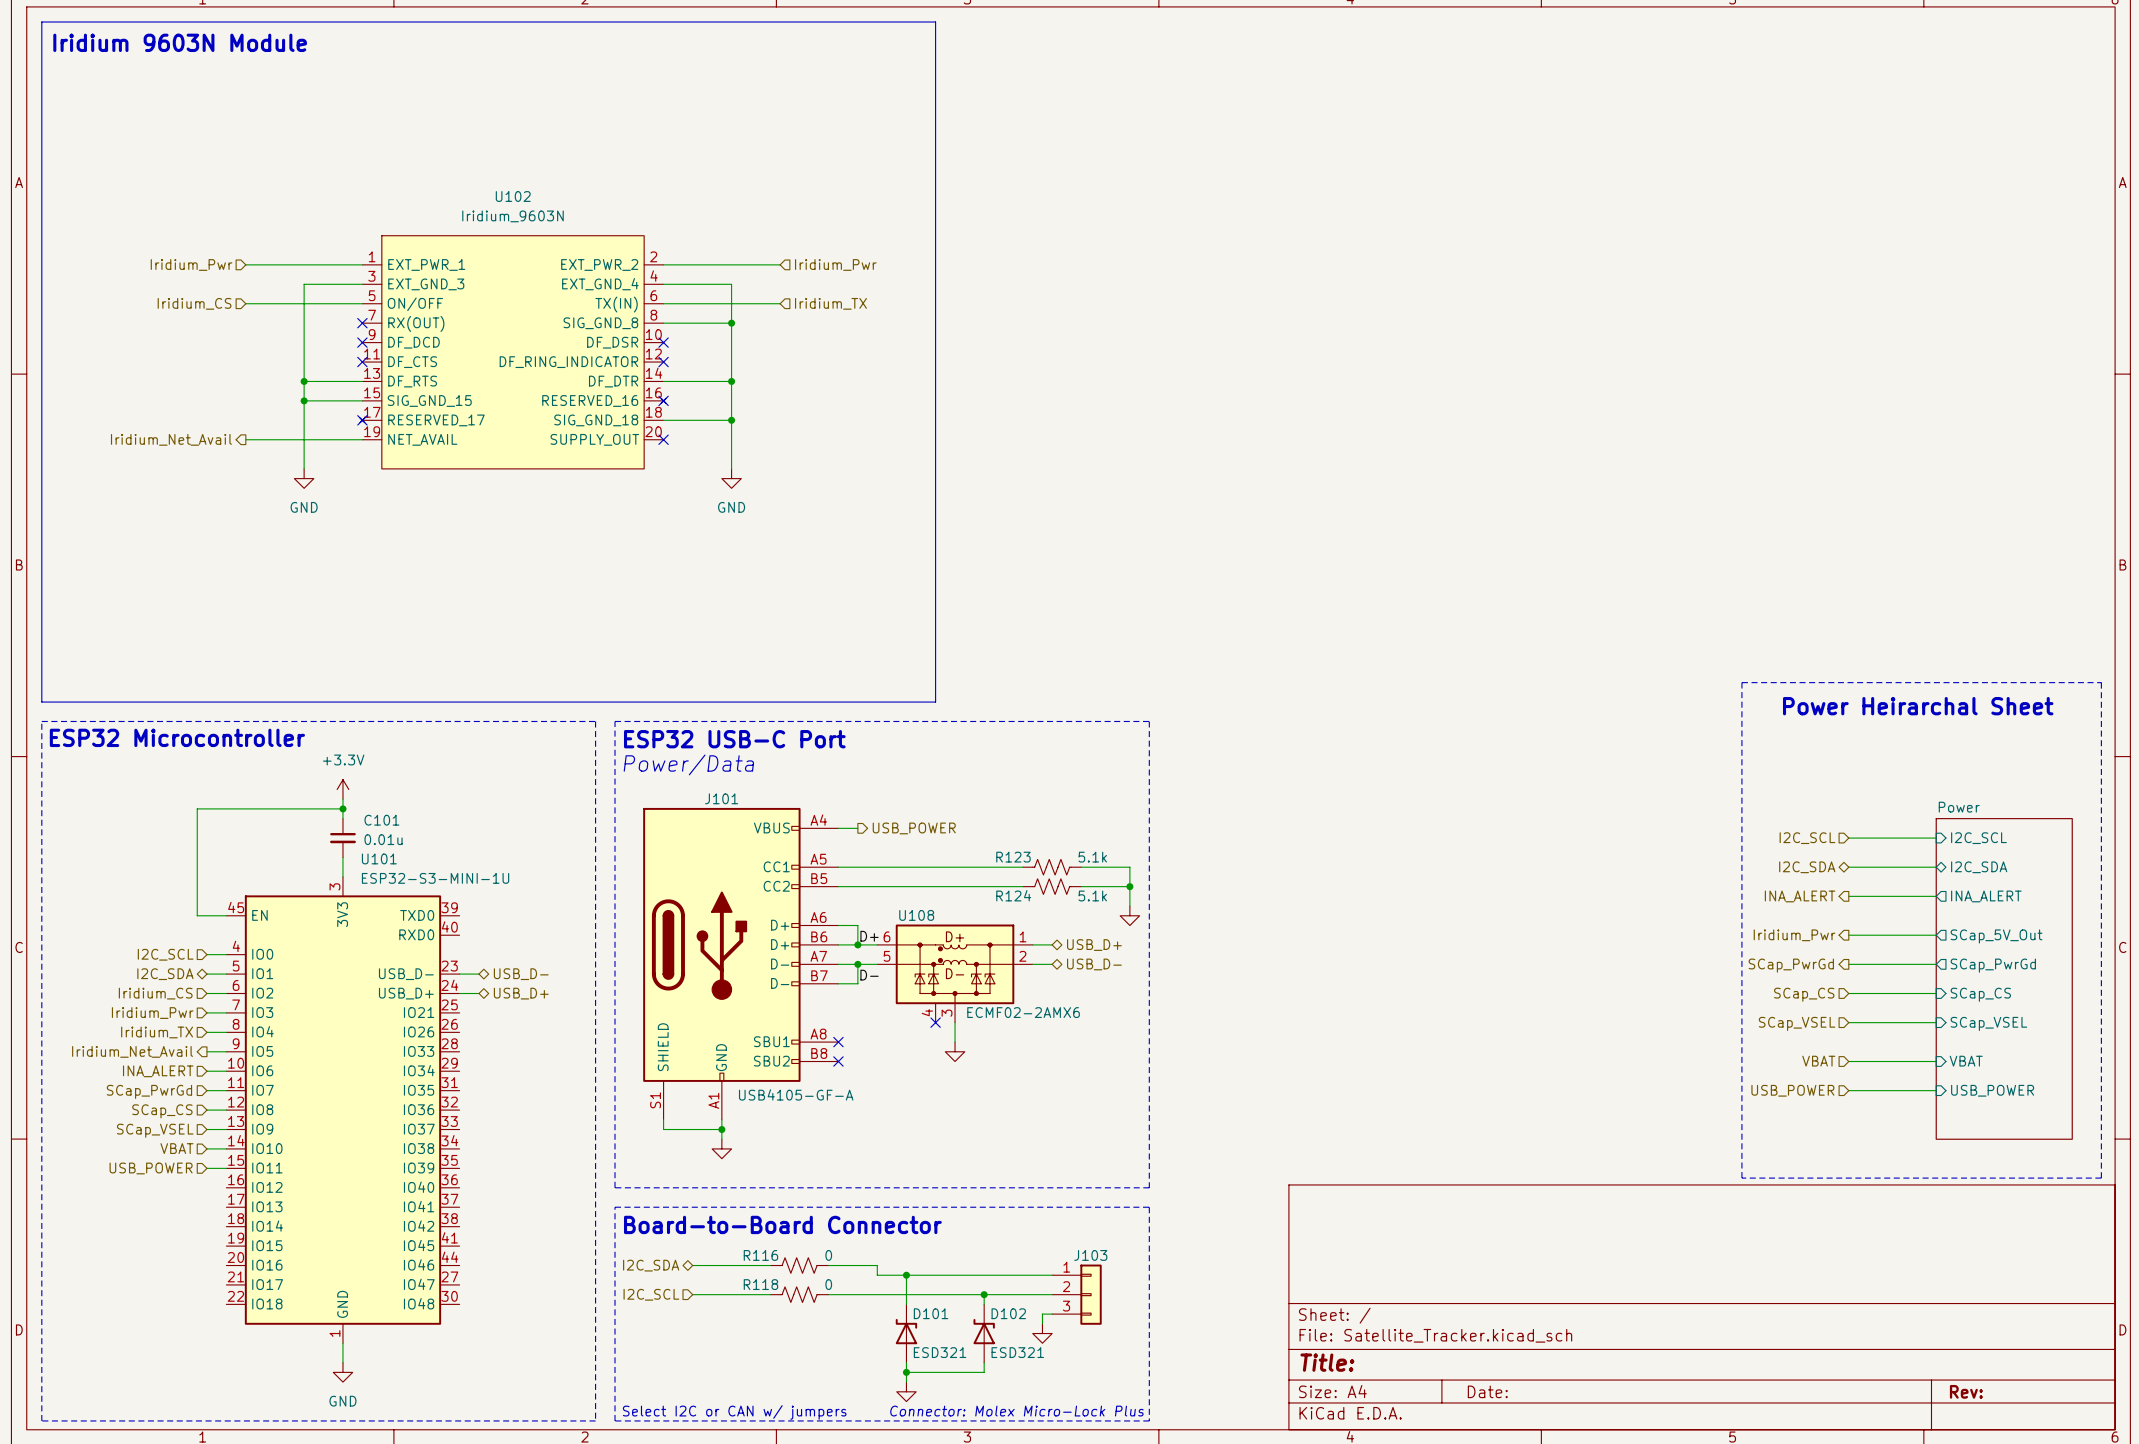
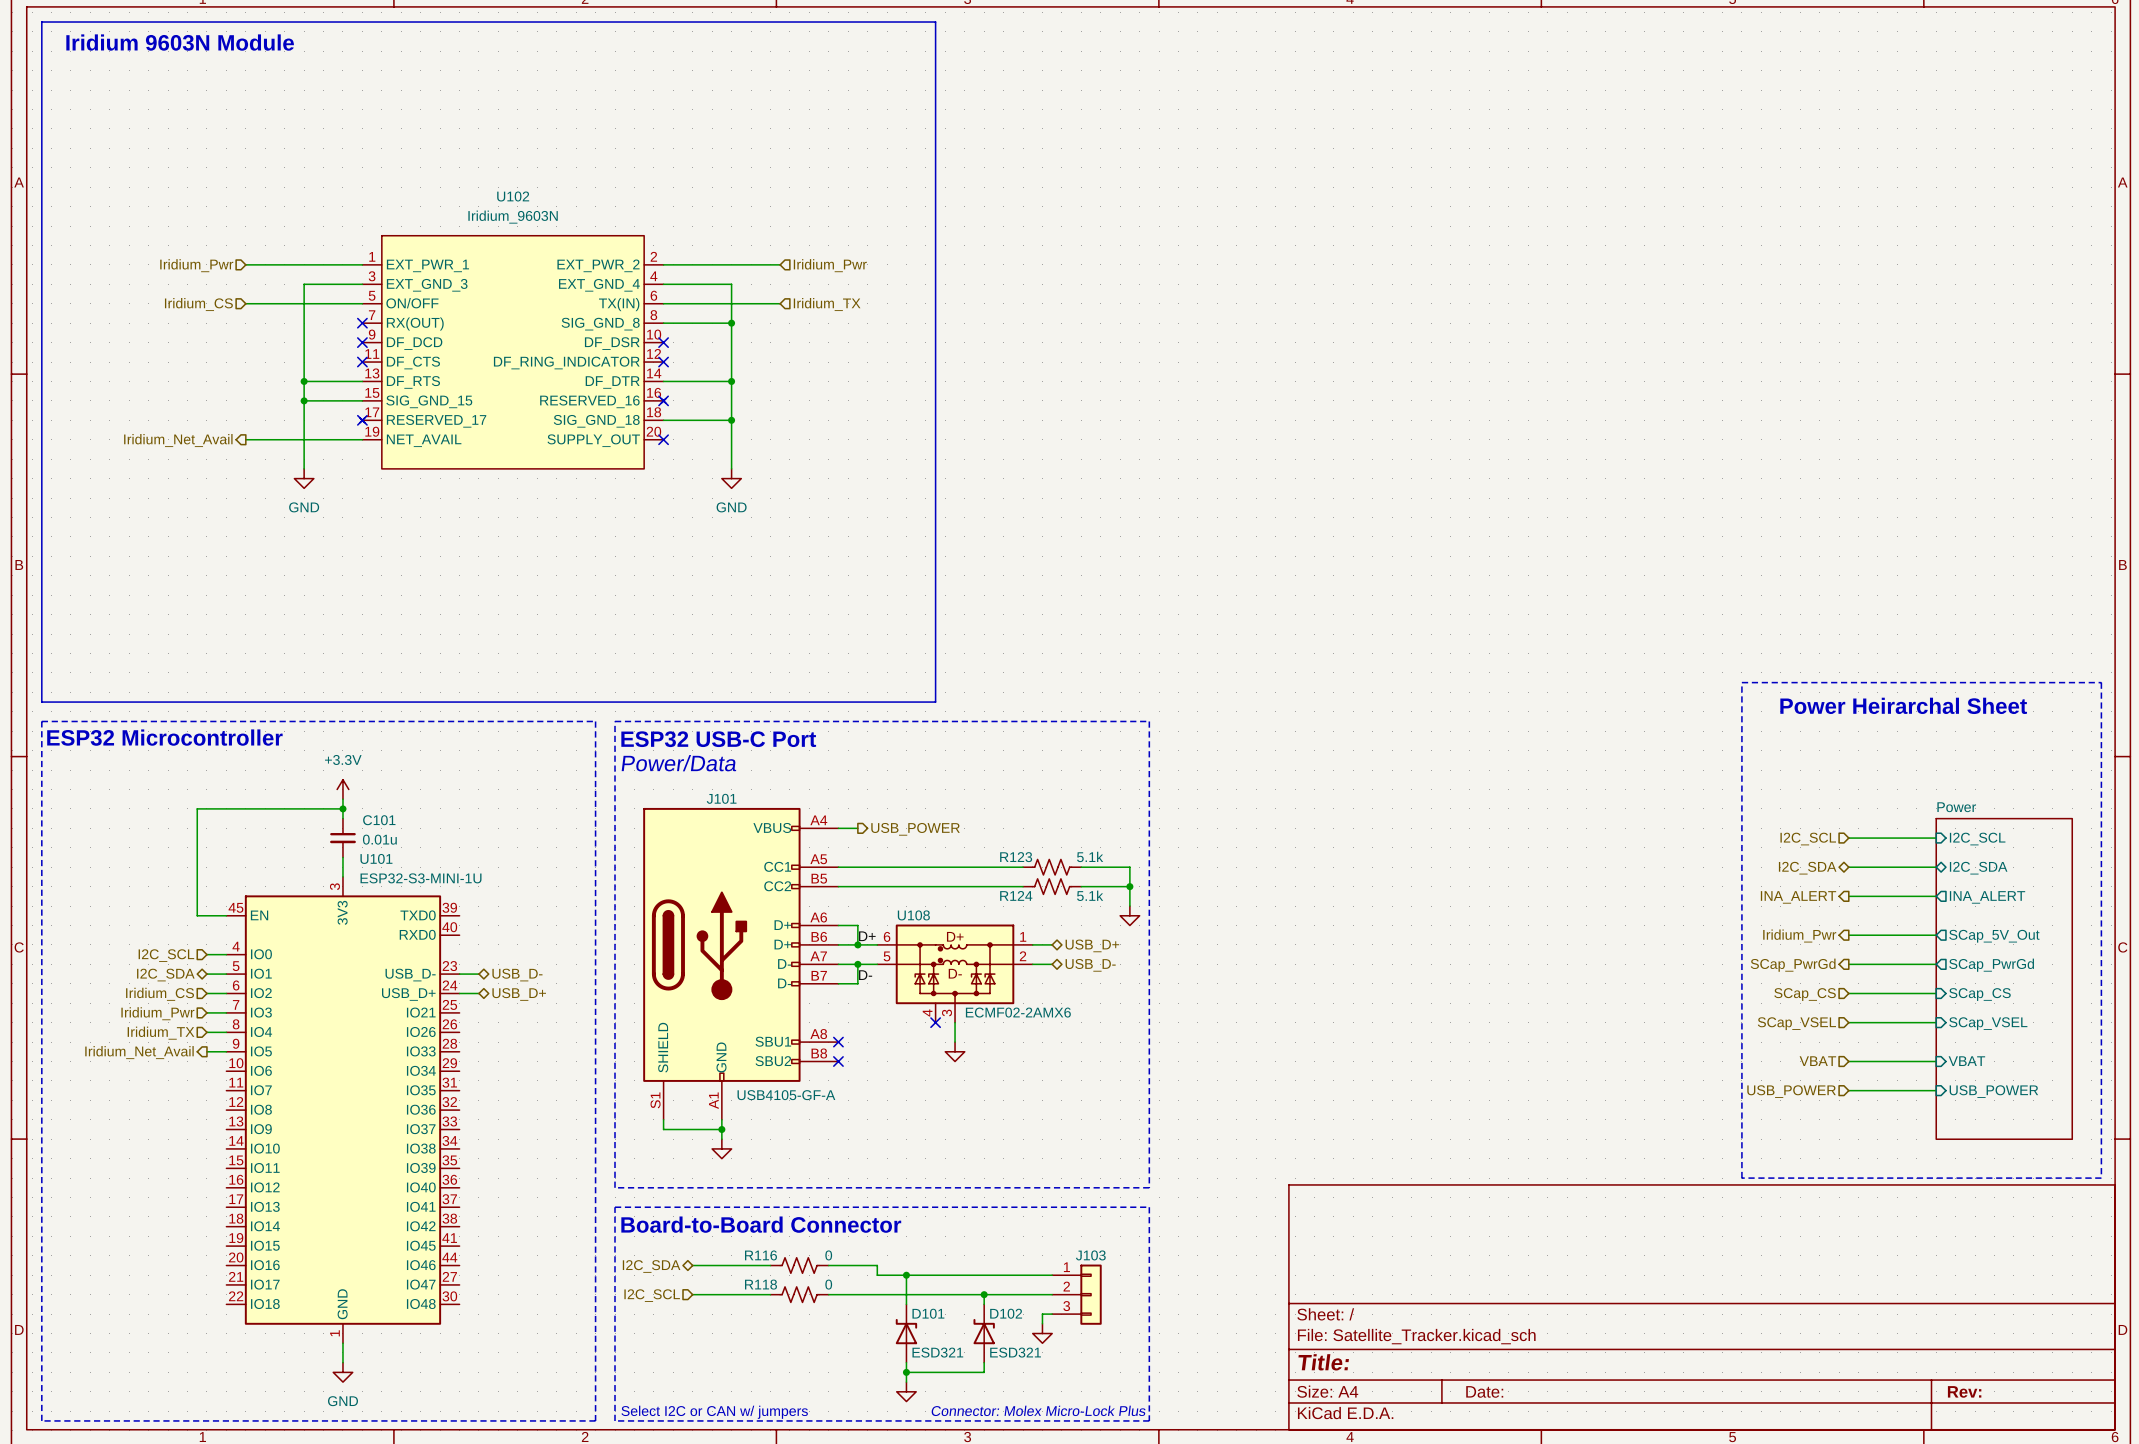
hierarchical label: INA_ALERT (158, 1071) -> none
wire: (206, 1071) (226, 1071) -> none
wire: (206, 1090) (226, 1090) -> none
hierarchical label: SCap_PwrGd (149, 1091) -> none
wire: (206, 1110) (226, 1110) -> none
hierarchical label: SCap_CS (162, 1111) -> none
wire: (206, 1129) (226, 1129) -> none
hierarchical label: SCap_VSEL (155, 1130) -> none
hierarchical label: VBAT (176, 1148) -> none
wire: (206, 1148) (226, 1148) -> none
hierarchical label: USB_POWER (151, 1168) -> none
wire: (206, 1168) (226, 1168) -> none

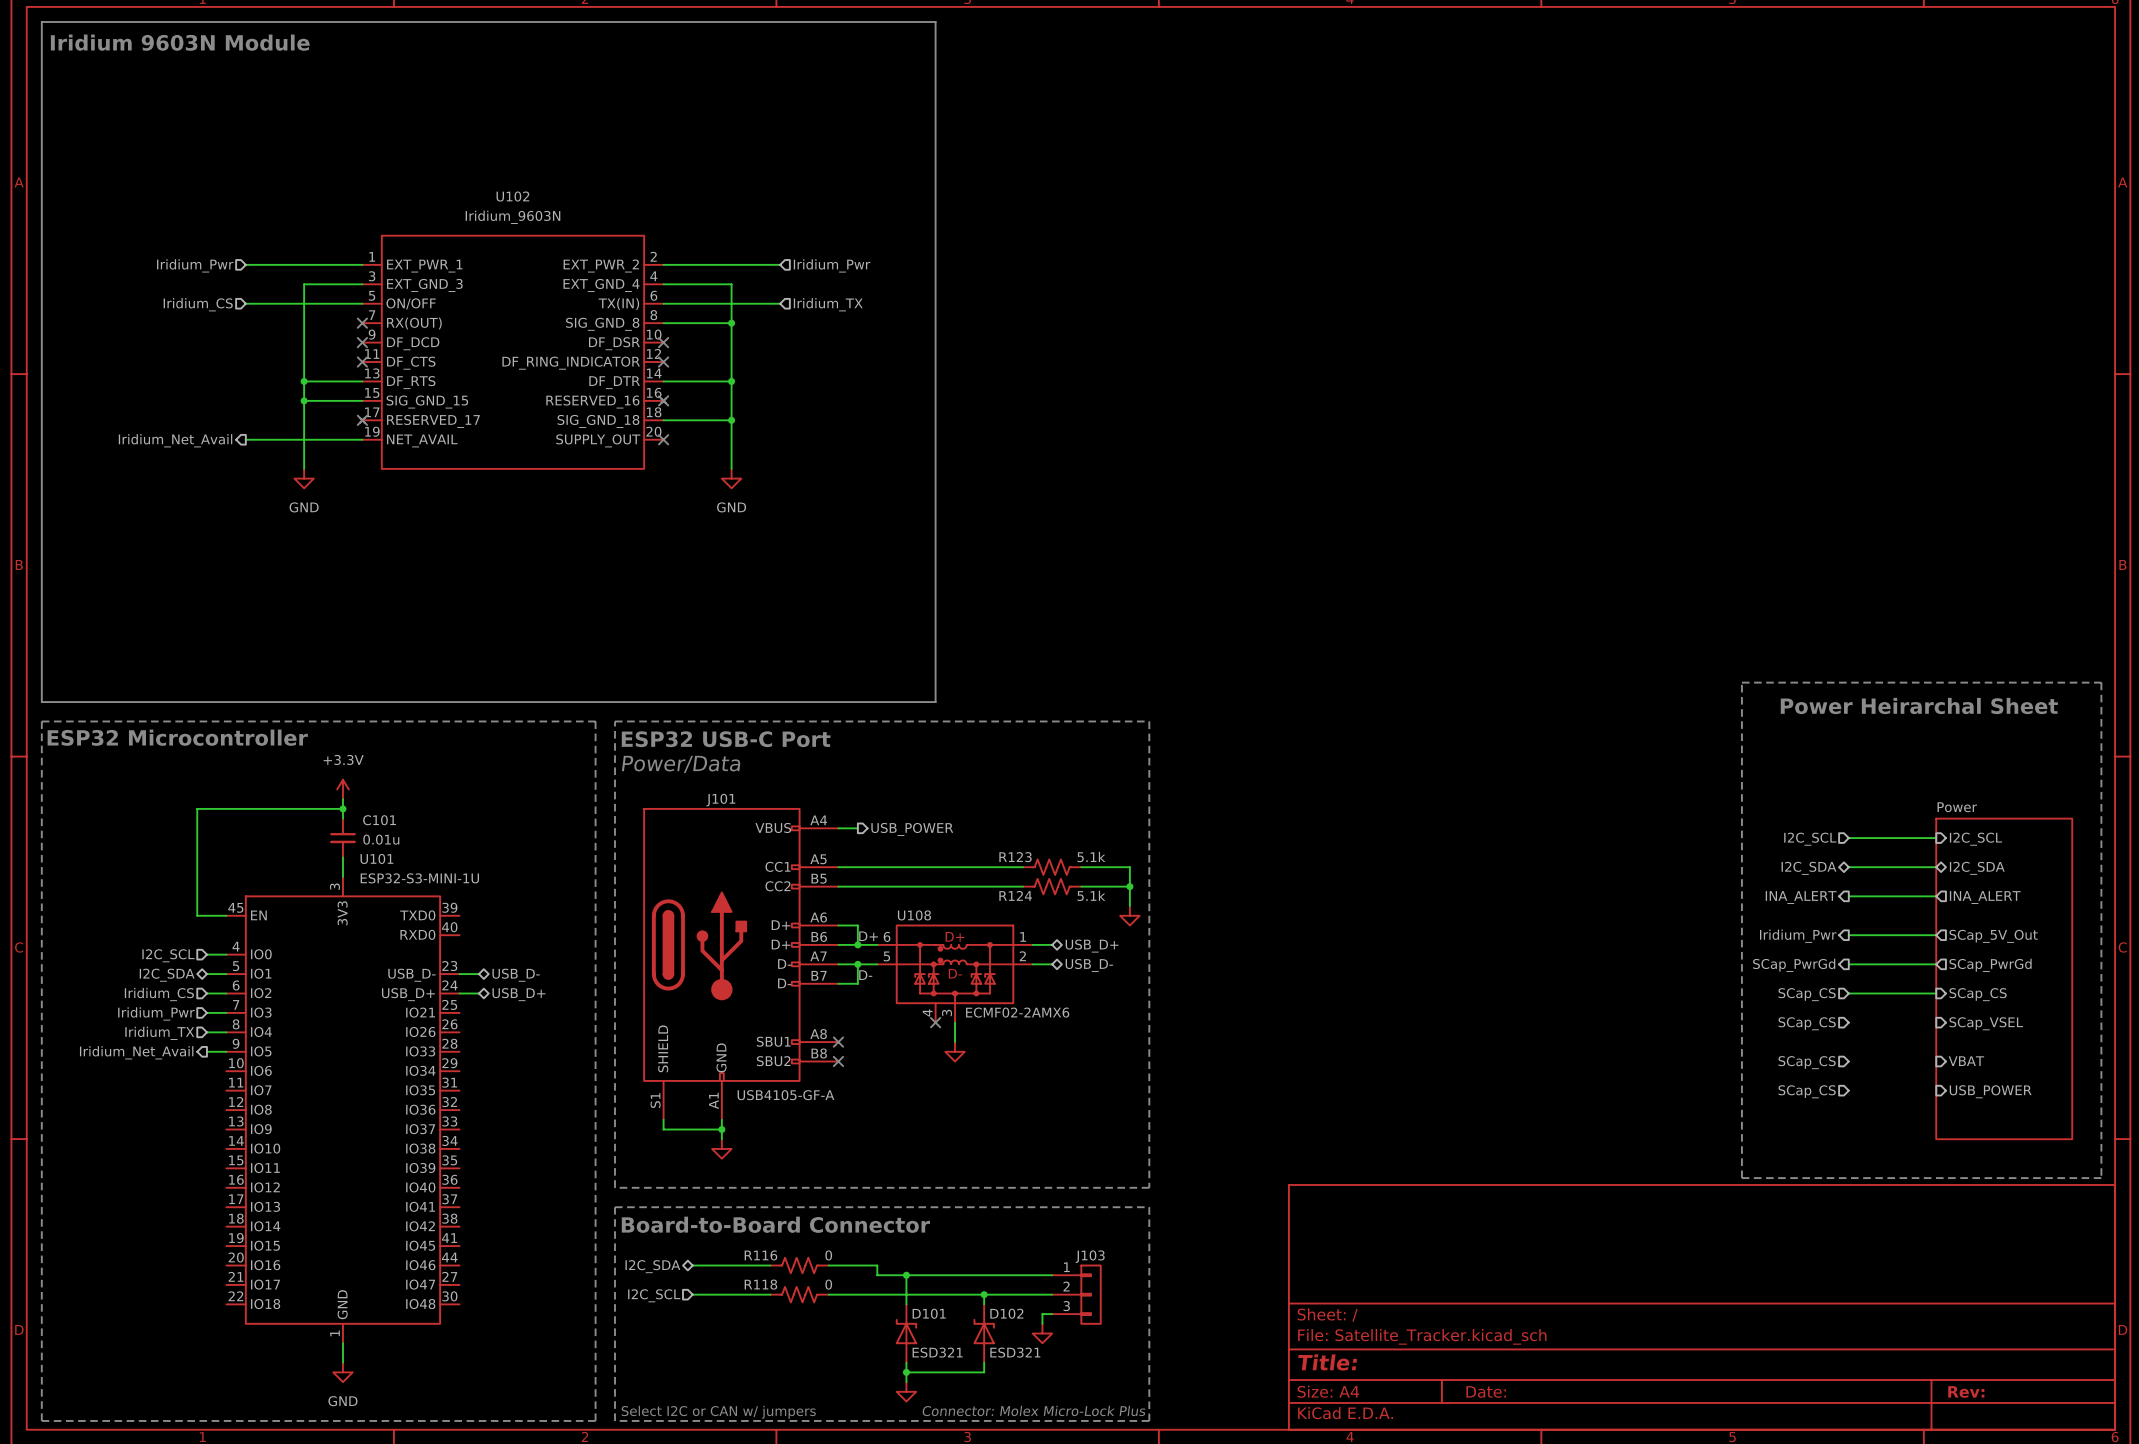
wire: (1848, 1022) (1936, 1022) -> none
hierarchical label: SCap_VSEL (1796, 1023) -> SCap_CS (1807, 1023)
hierarchical label: VBAT (1817, 1061) -> SCap_CS (1807, 1062)
wire: (1848, 1061) (1936, 1061) -> none
wire: (1848, 1090) (1936, 1090) -> none
hierarchical label: USB_POWER (1791, 1091) -> SCap_CS (1807, 1091)

